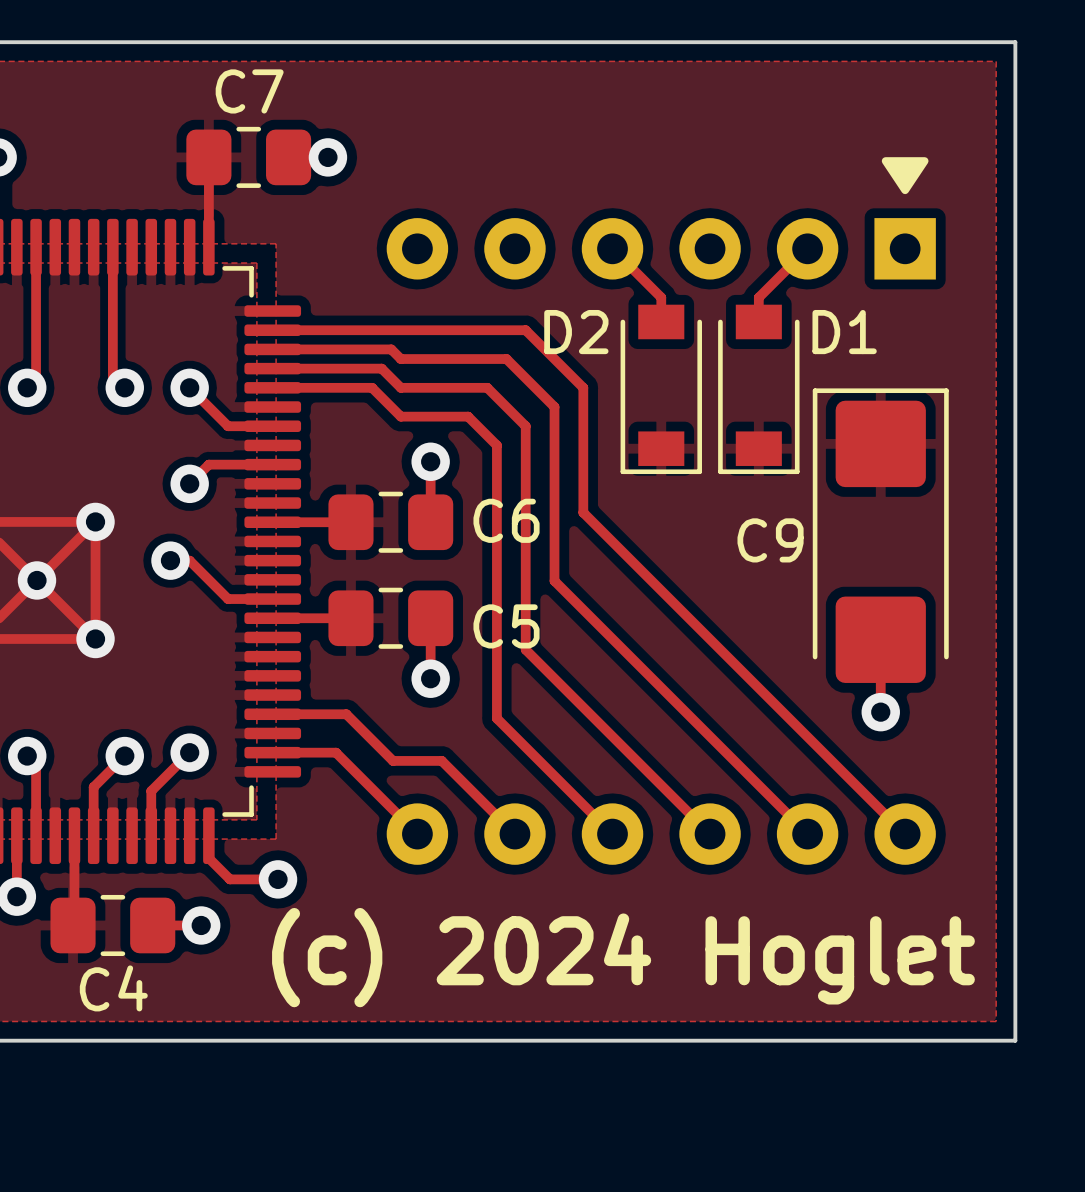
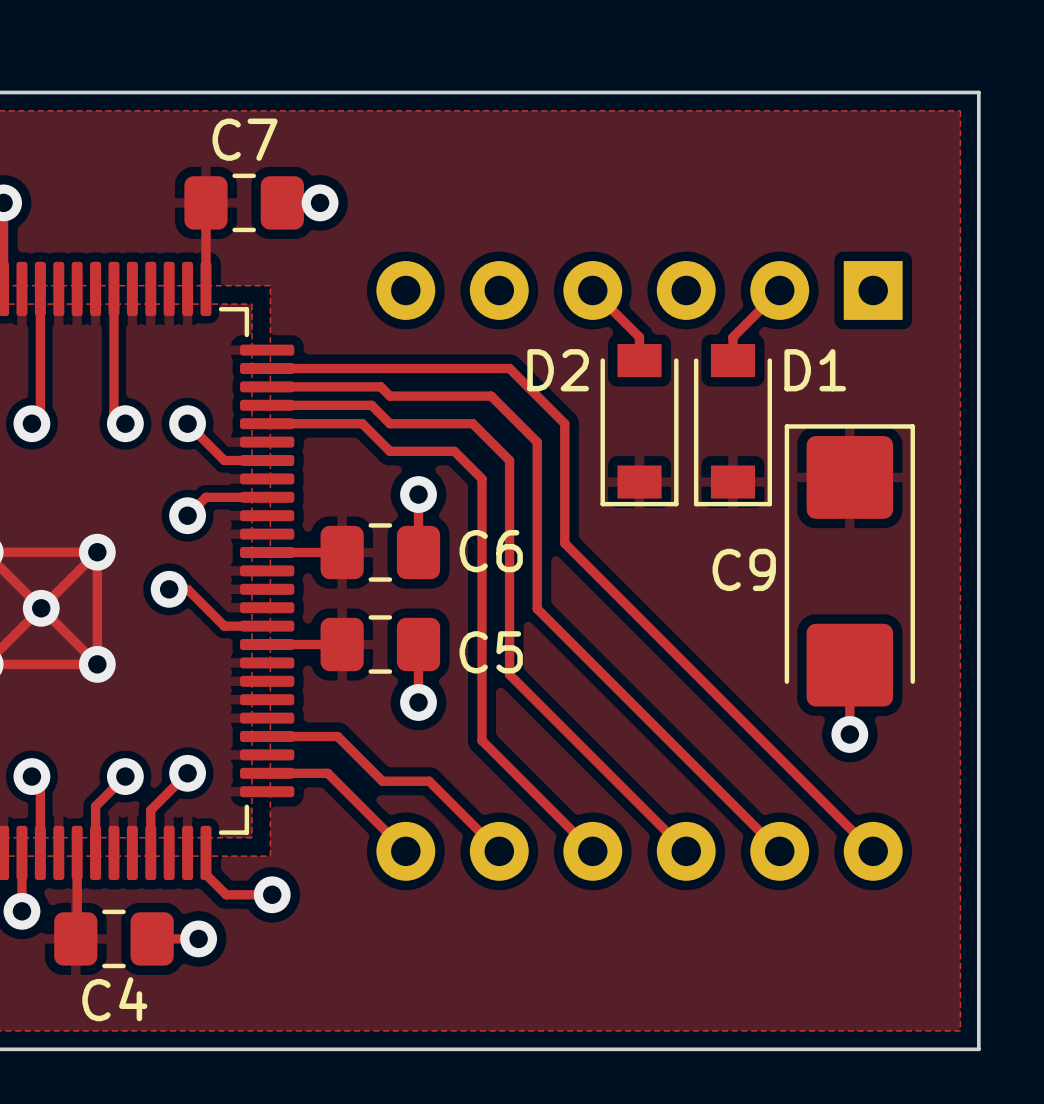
drawing: [881, 157, 929, 195] -> none
text: (c) 2024 Hoglet (623, 957) -> none

